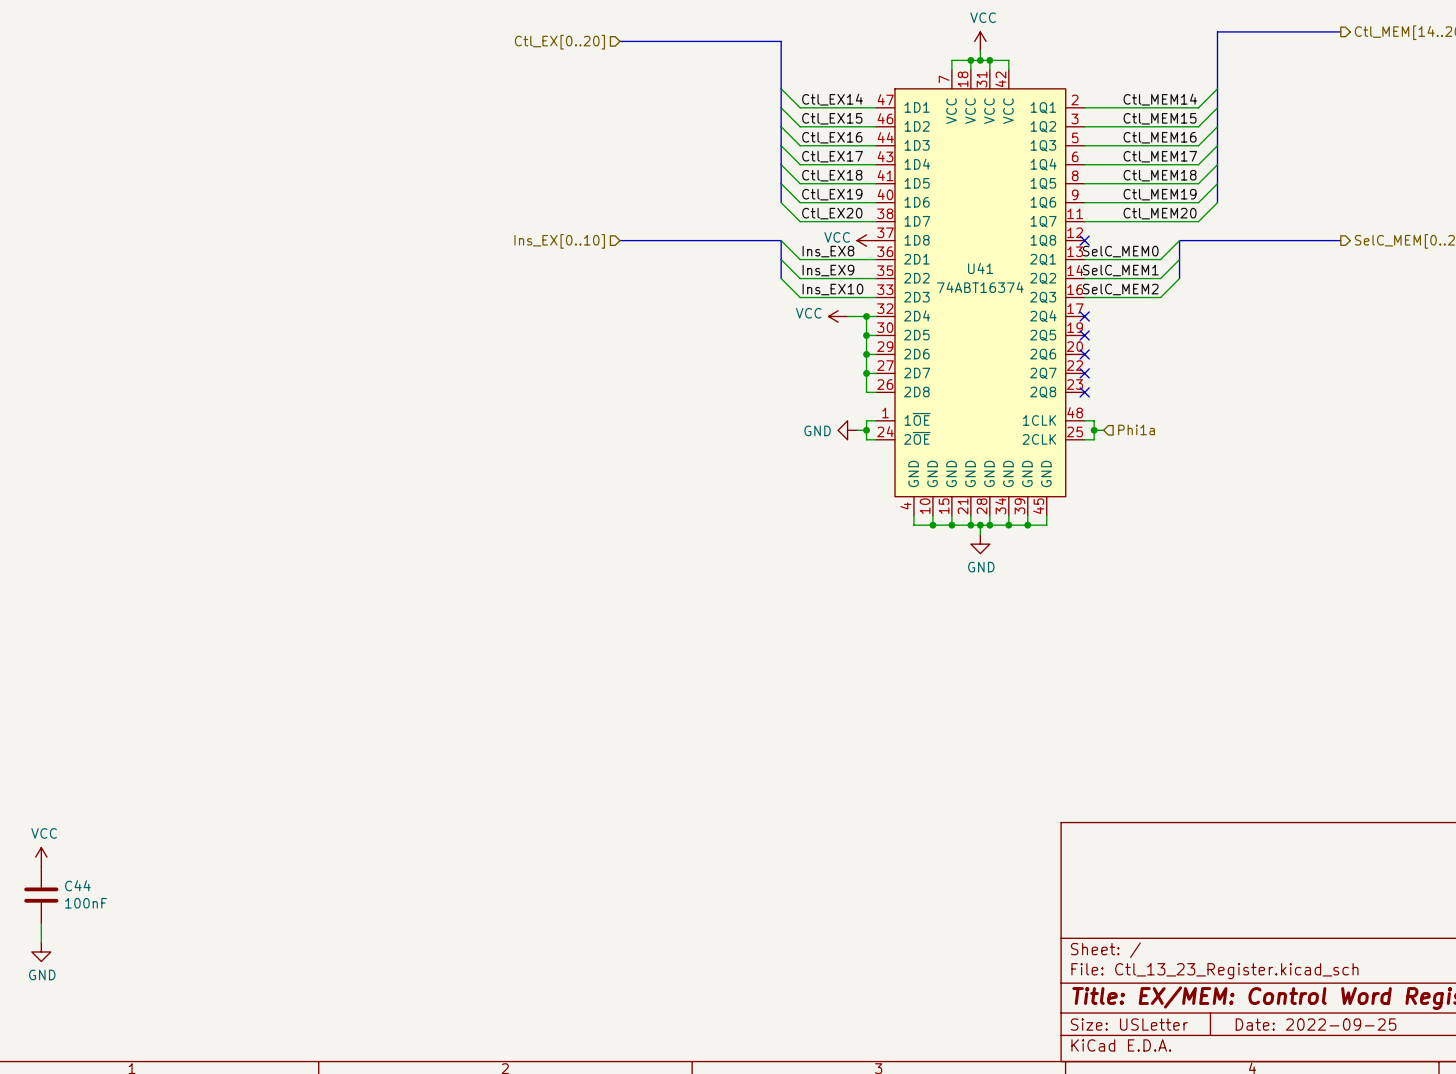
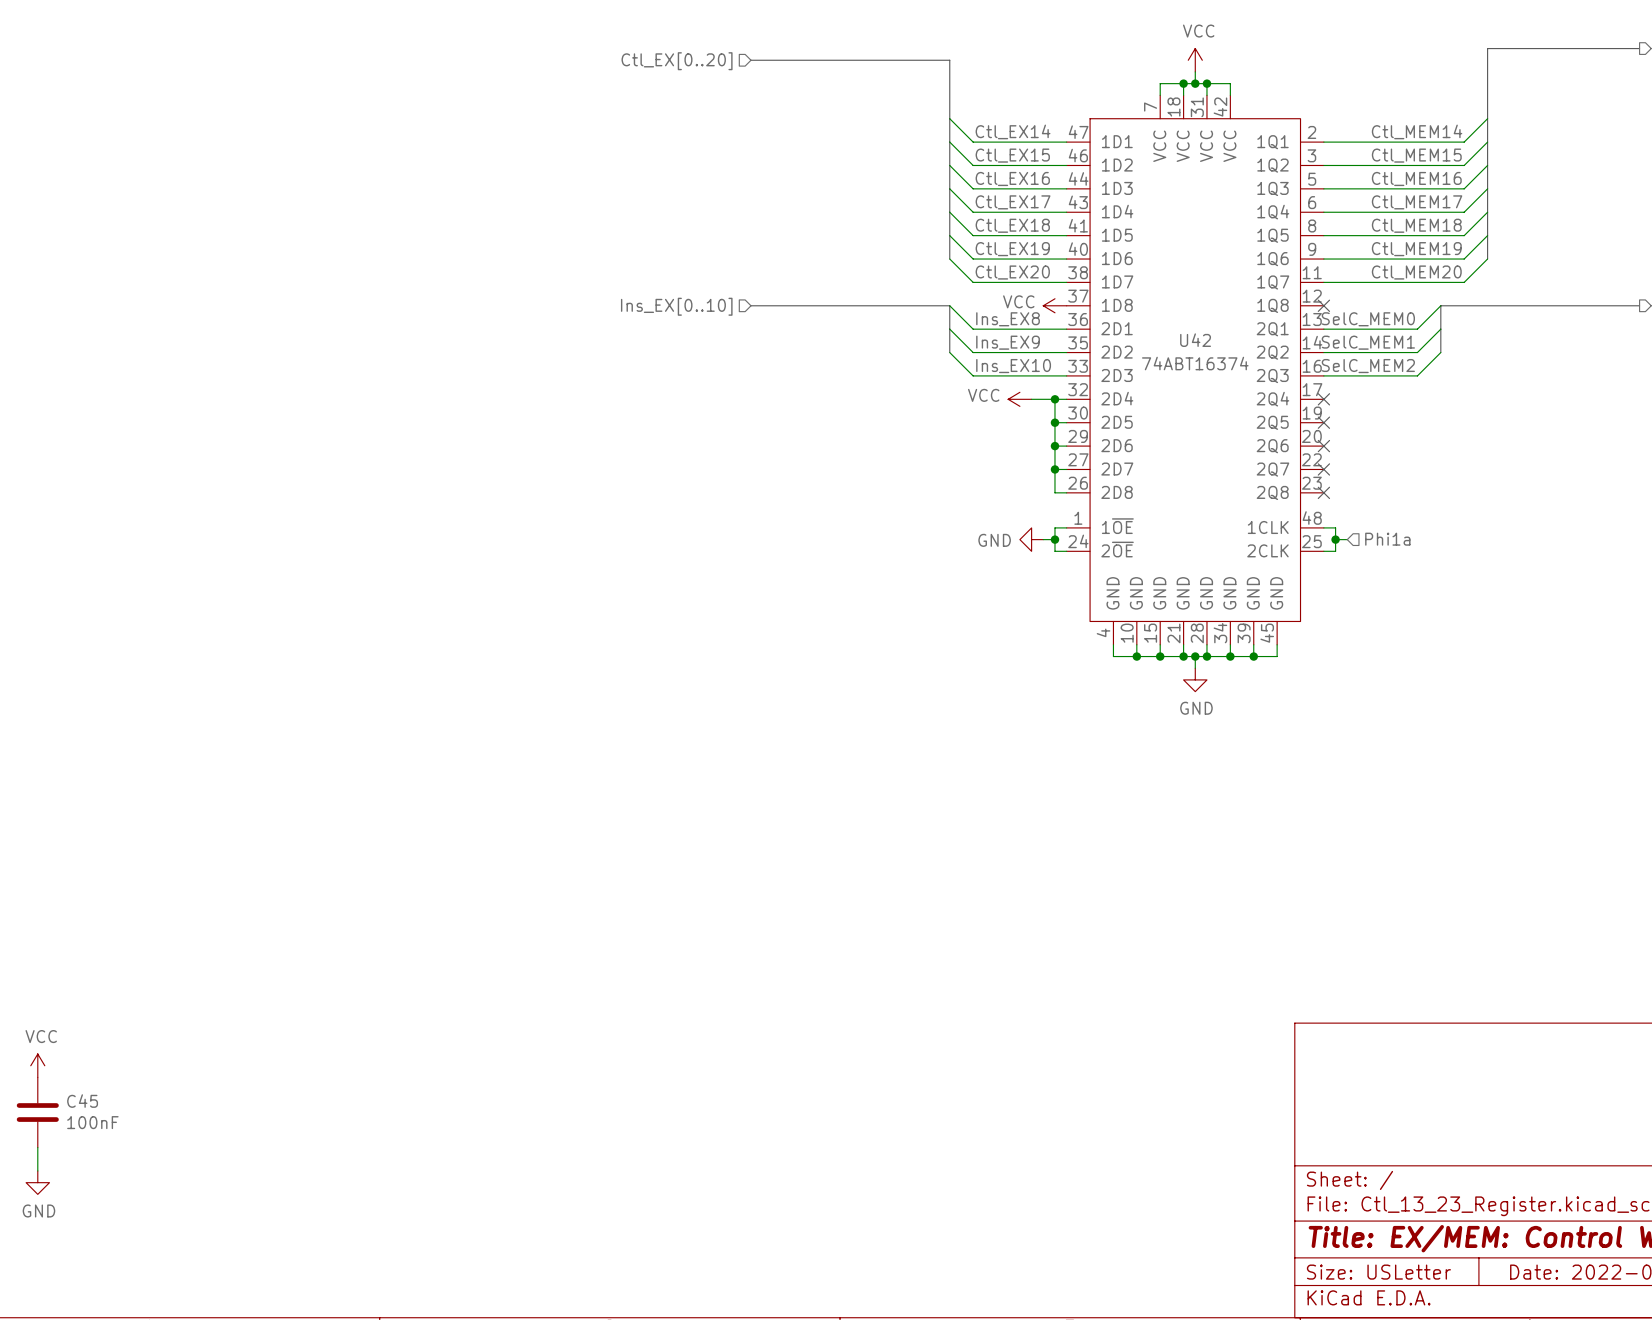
U41 name: U41 (980, 268) -> U42 (1195, 340)
C44 name: C44 (77, 885) -> C45 (82, 1101)

